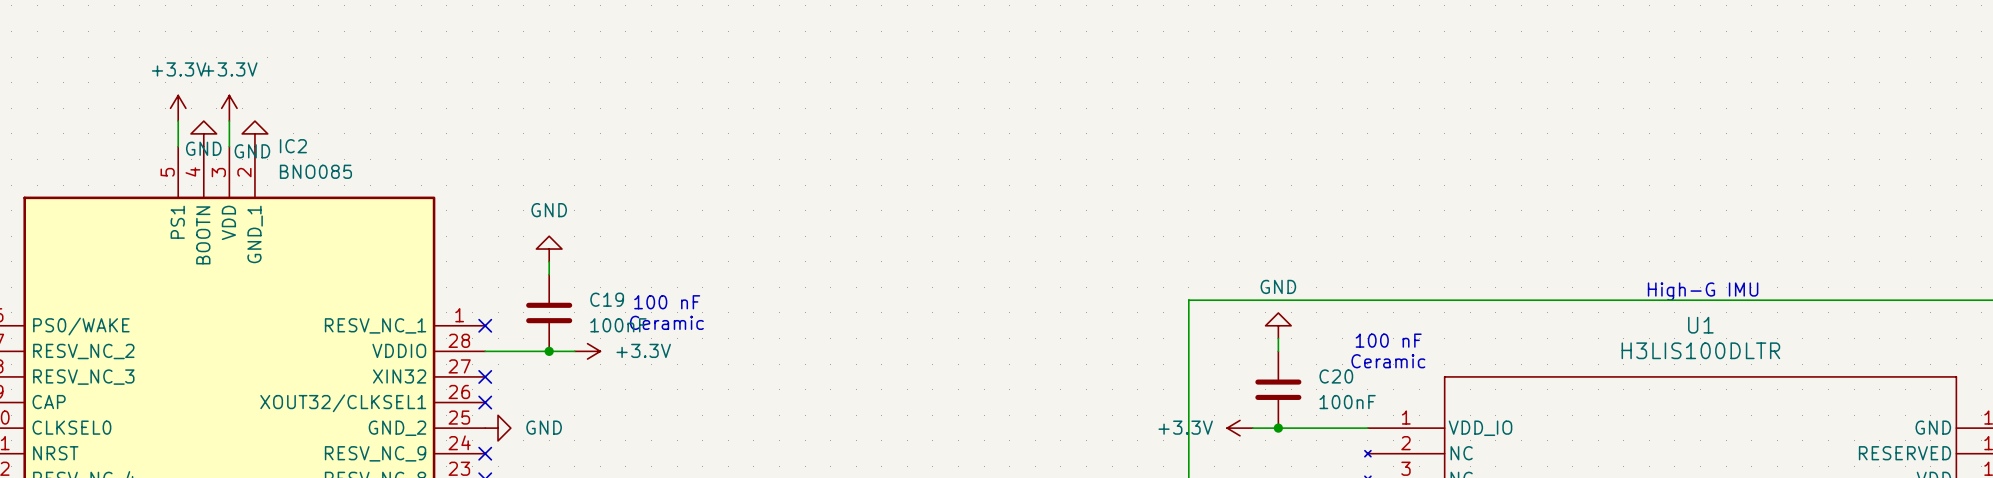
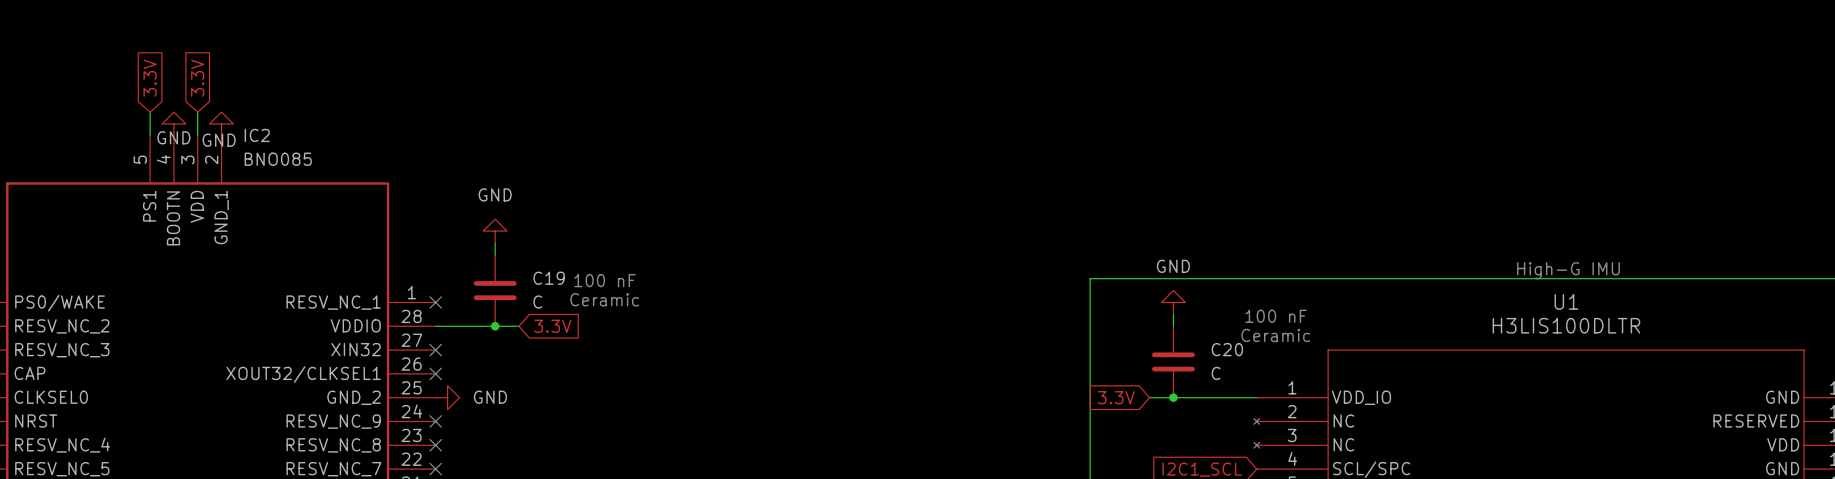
global label: none -> 3.3V (150, 78)
global label: none -> 3.3V (197, 78)
power symbol: +3.3V (178, 108) -> none
power symbol: +3.3V (229, 108) -> none
C19 value: 100nF (618, 325) -> C (537, 302)
power symbol: +3.3V (587, 351) -> none
global label: none -> 3.3V (552, 326)
C20 value: 100nF (1347, 402) -> C (1216, 373)
global label: none -> 3.3V (1116, 397)
power symbol: +3.3V (1239, 428) -> none

